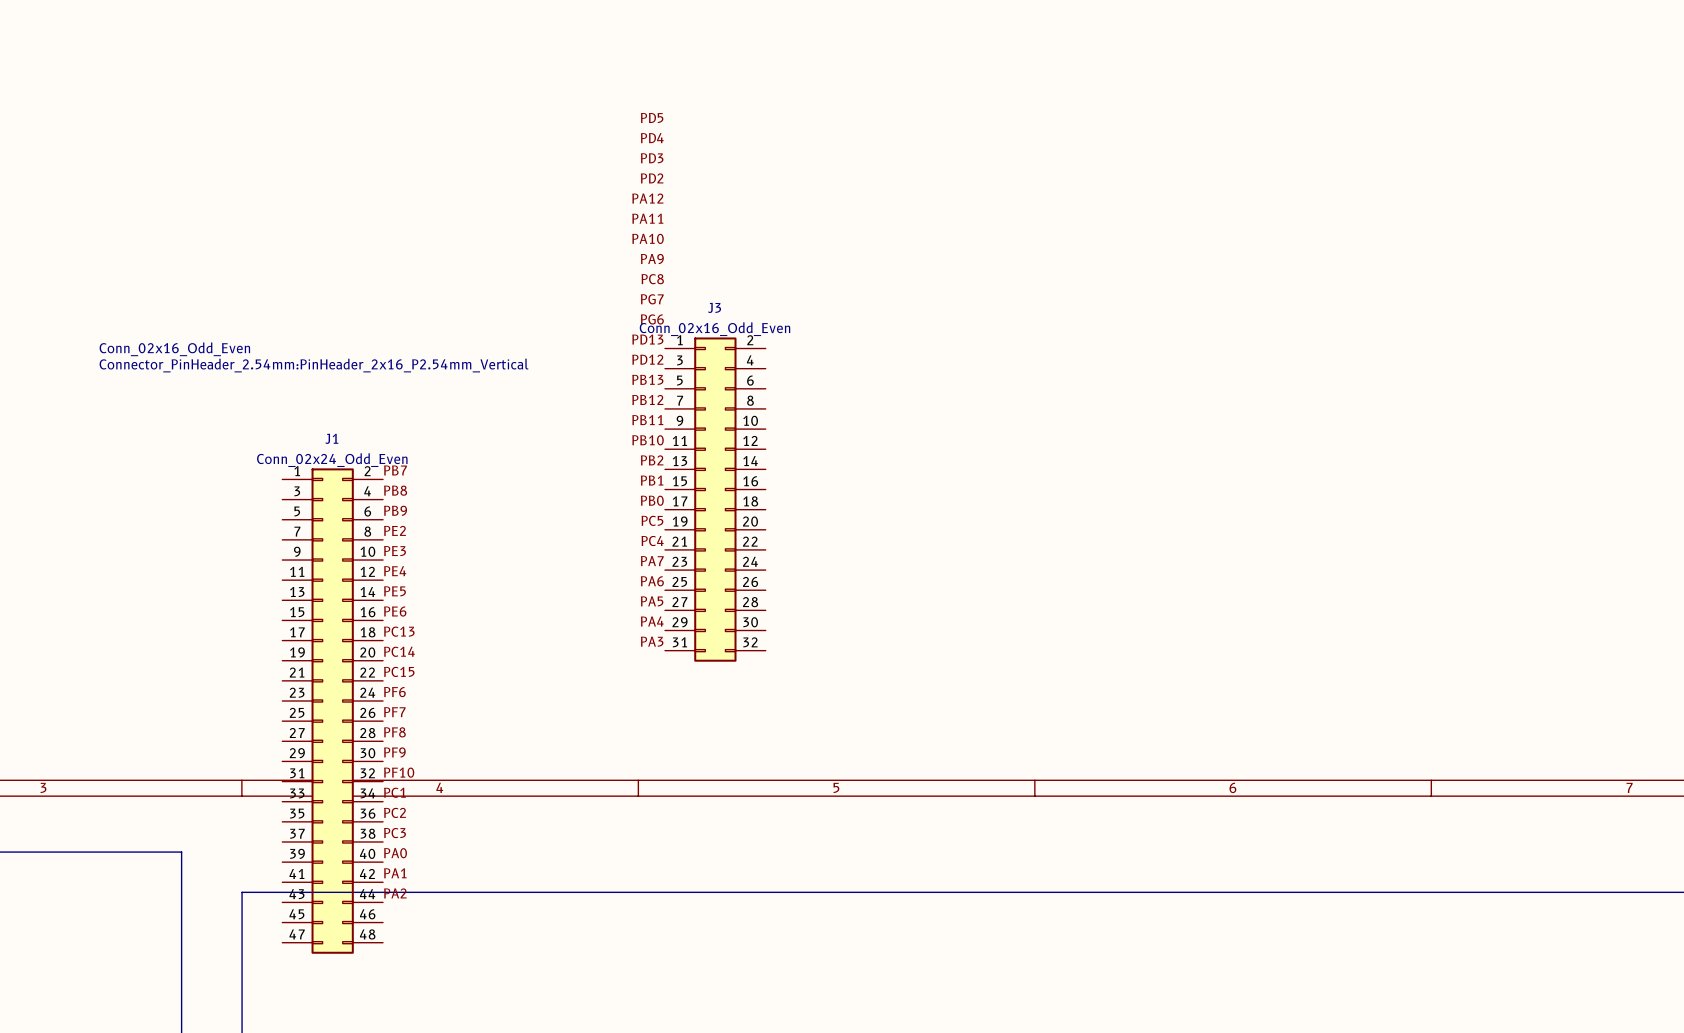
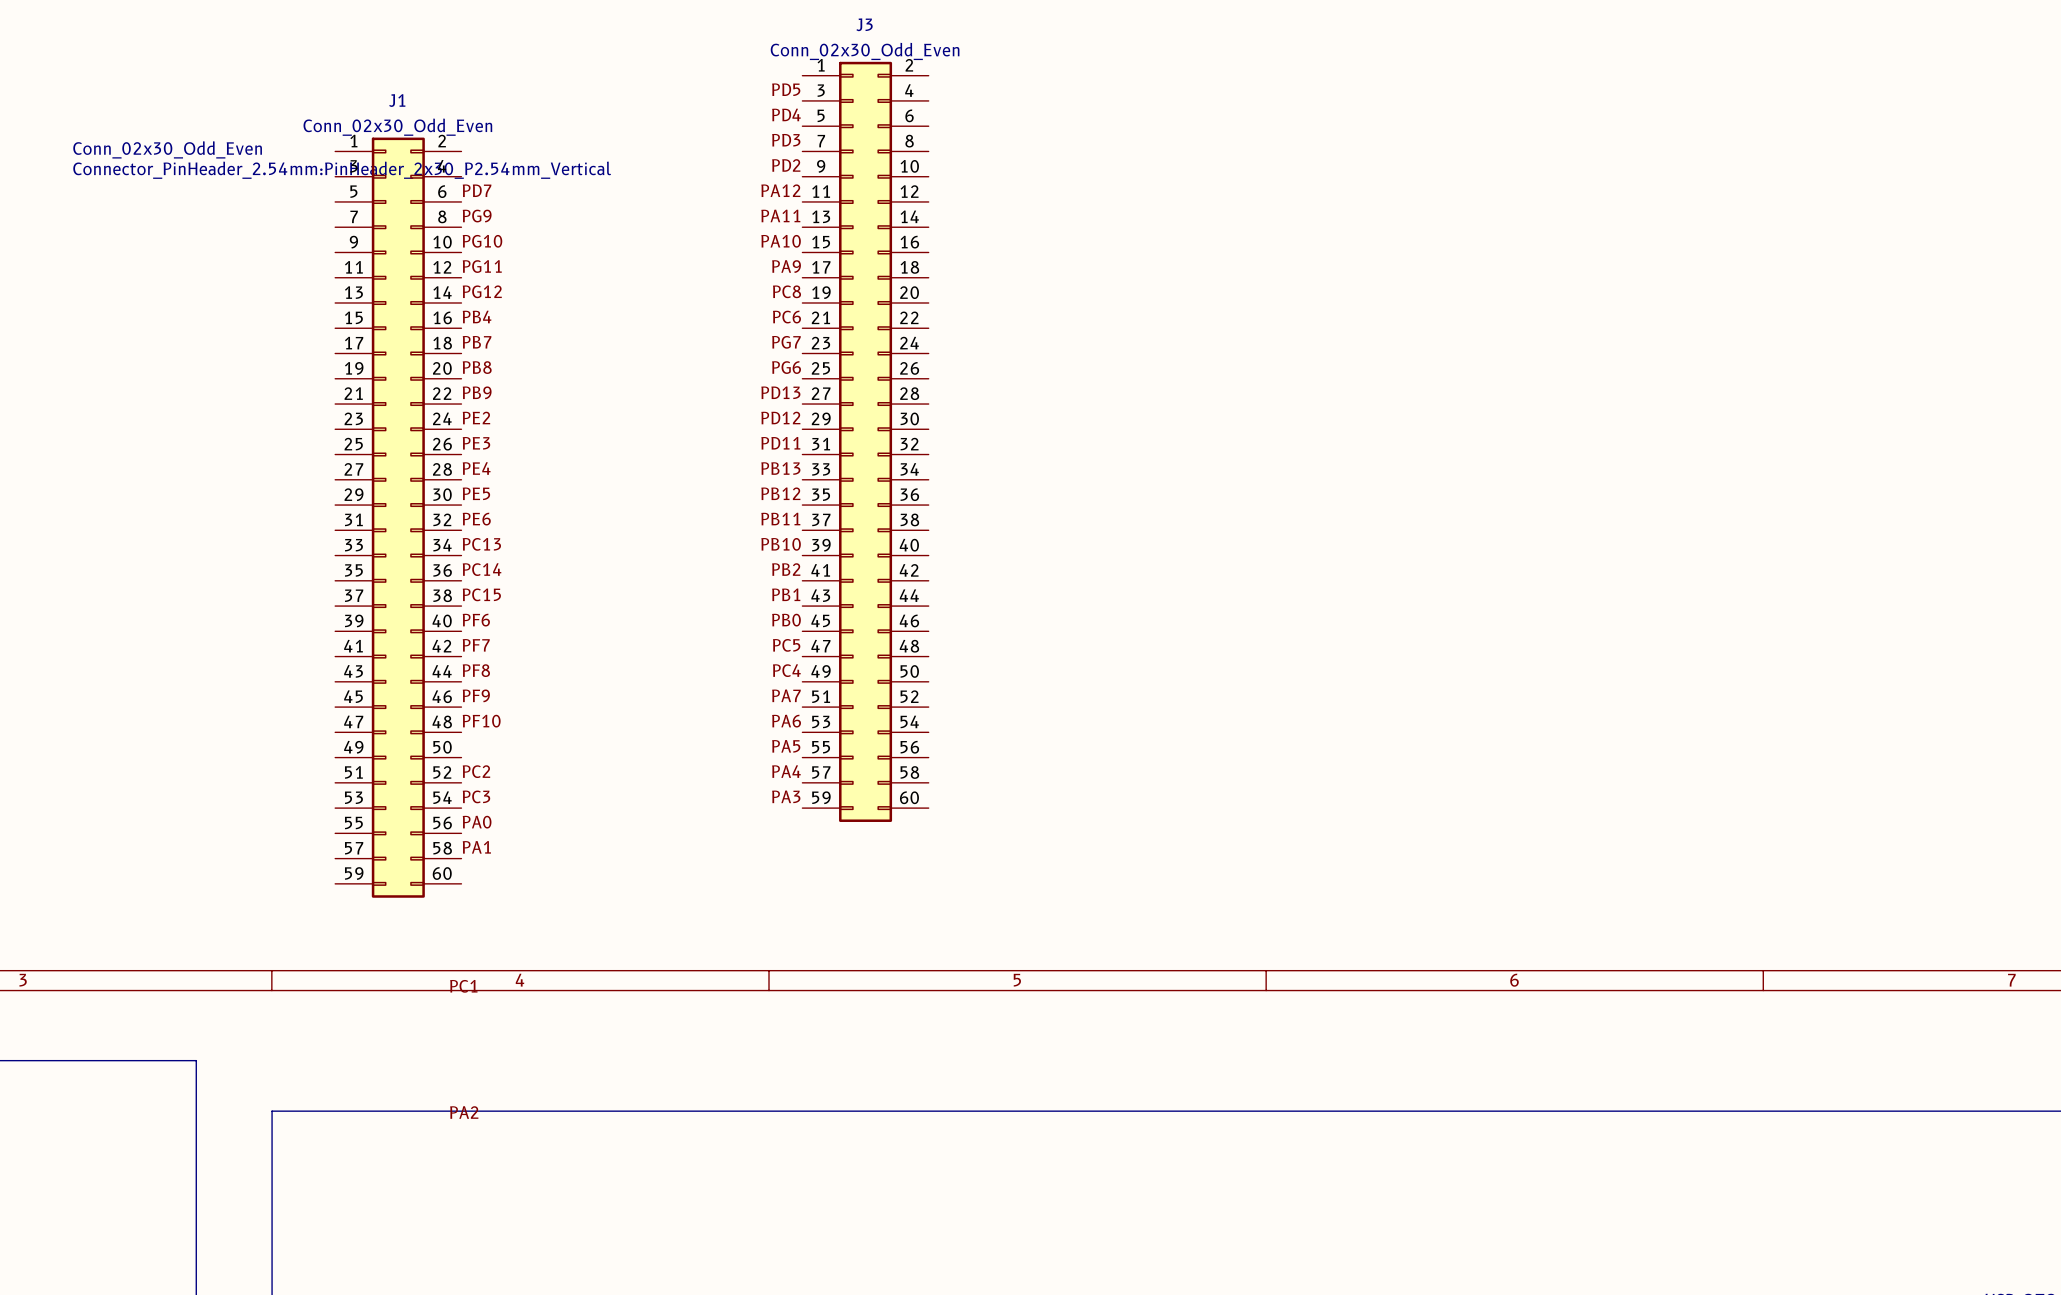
label: none -> PD5 (786, 89)
label: none -> PD4 (786, 114)
label: PD5 (652, 118) -> PD3 (786, 140)
text: none -> Conn_02x30_Odd_Even (167, 149)
label: PD4 (652, 138) -> PD2 (786, 165)
text: none -> Connector_PinHeader_2.54mm:PinHeader_2x30_P2.54mm_Vertical (342, 170)
label: none -> PD7 (477, 190)
label: PD3 (652, 158) -> PA12 (780, 190)
label: none -> PG9 (477, 216)
label: PD2 (652, 178) -> PA11 (780, 215)
label: none -> PG10 (482, 241)
label: PA12 (647, 198) -> PA10 (781, 241)
label: none -> PG11 (482, 266)
label: PA11 (647, 218) -> PA9 (786, 266)
label: none -> PG12 (482, 291)
label: PA10 (648, 238) -> PC8 (786, 291)
label: none -> PB4 (477, 316)
label: PA9 (652, 259) -> PC6 (786, 317)
label: PC8 (652, 279) -> PG7 (786, 342)
label: PG7 (652, 299) -> PG6 (786, 367)
J3 name position: J3 (714, 307) -> J3 (864, 24)
label: PG6 (652, 319) -> PD13 (780, 392)
J3 value: Conn_02x16_Odd_Even (714, 329) -> Conn_02x30_Odd_Even (865, 51)
J3 symbol: [665, 337, 766, 662] -> [802, 61, 929, 822]
label: PD13 (647, 339) -> PD12 (780, 418)
text: Conn_02x16_Odd_Even (174, 349) -> none
label: PD12 (647, 359) -> PD11 (780, 443)
text: Connector_PinHeader_2.54mm:PinHeader_2x16_P2.54mm_Vertical (314, 365) -> none
J1 name position: J1 (331, 438) -> J1 (397, 100)
J1 value: Conn_02x24_Odd_Even (332, 460) -> Conn_02x30_Odd_Even (397, 127)
J1 symbol: [282, 468, 384, 954] -> [335, 137, 462, 898]
label position: PB7 (395, 470) -> PB7 (477, 342)
label position: PB8 (395, 490) -> PB8 (477, 367)
label position: PB9 (395, 510) -> PB9 (477, 392)
label position: PE2 (394, 530) -> PE2 (476, 418)
label position: PE3 (395, 551) -> PE3 (476, 443)
label position: PE4 (395, 571) -> PE4 (476, 468)
label position: PE5 (394, 591) -> PE5 (476, 493)
label position: PE6 (395, 611) -> PE6 (476, 519)
label position: PC13 (399, 631) -> PC13 (481, 544)
label position: PC14 (399, 651) -> PC14 (482, 569)
label position: PC15 (399, 671) -> PC15 (481, 594)
label position: PF6 (394, 692) -> PF6 (476, 620)
label position: PF7 (394, 712) -> PF7 (476, 645)
label position: PF8 (394, 732) -> PF8 (476, 670)
label position: PF9 (394, 752) -> PF9 (476, 695)
label position: PF10 (399, 772) -> PF10 (481, 721)
label position: PC2 (394, 812) -> PC2 (476, 771)
label position: PC3 (395, 833) -> PC3 (476, 796)
label position: PA0 (395, 853) -> PA0 (477, 822)
label position: PA1 (395, 873) -> PA1 (476, 847)

